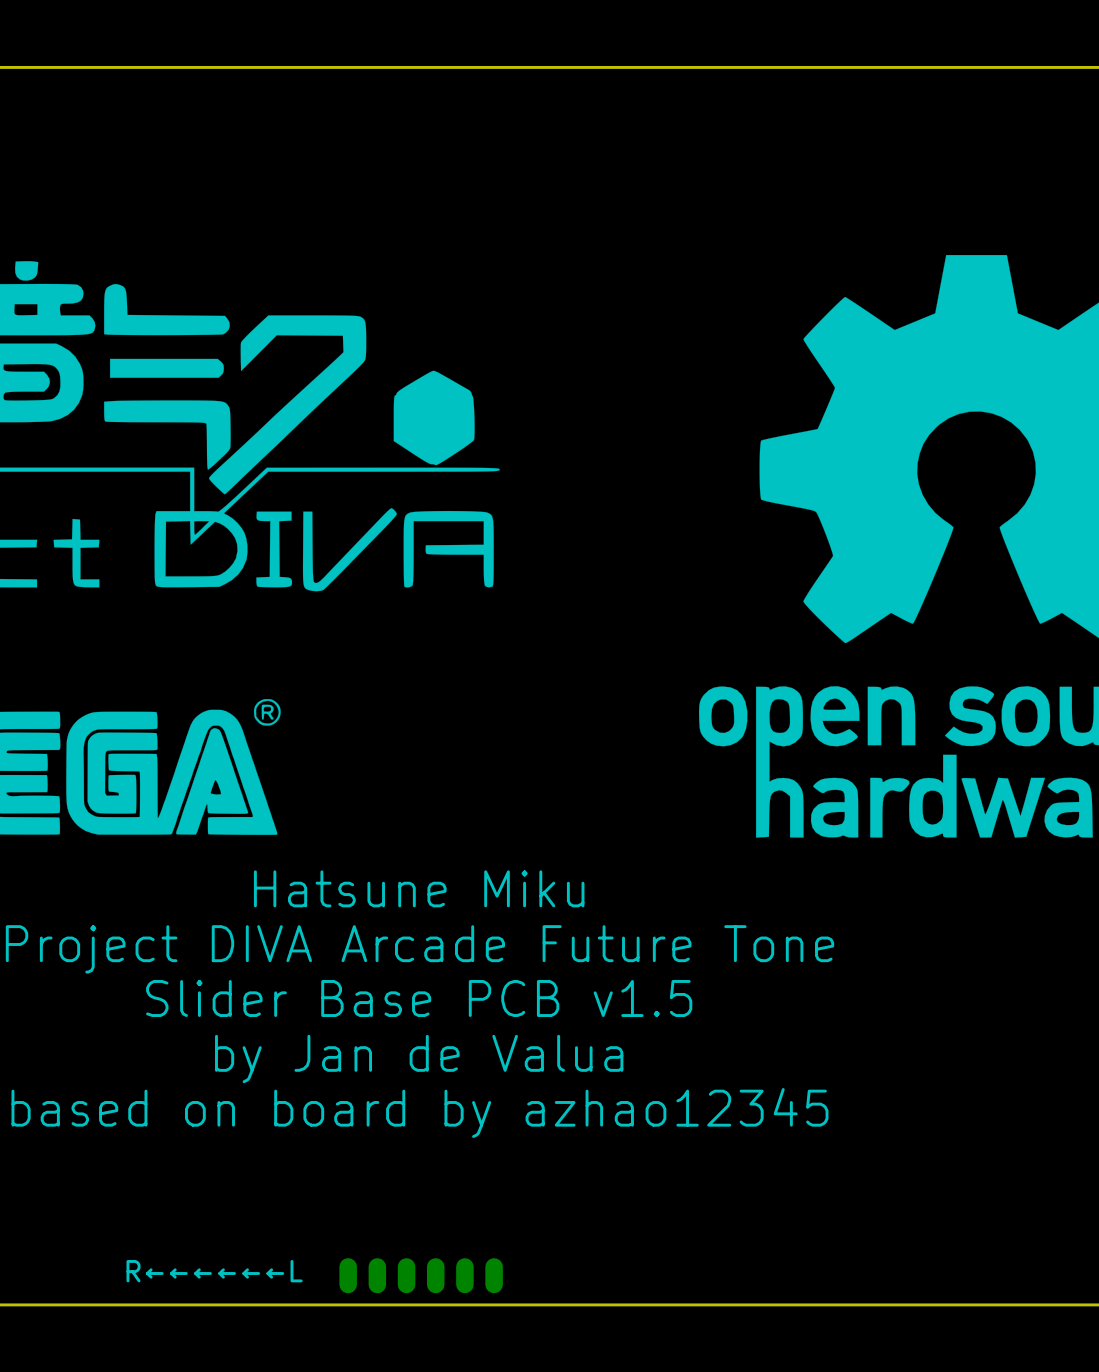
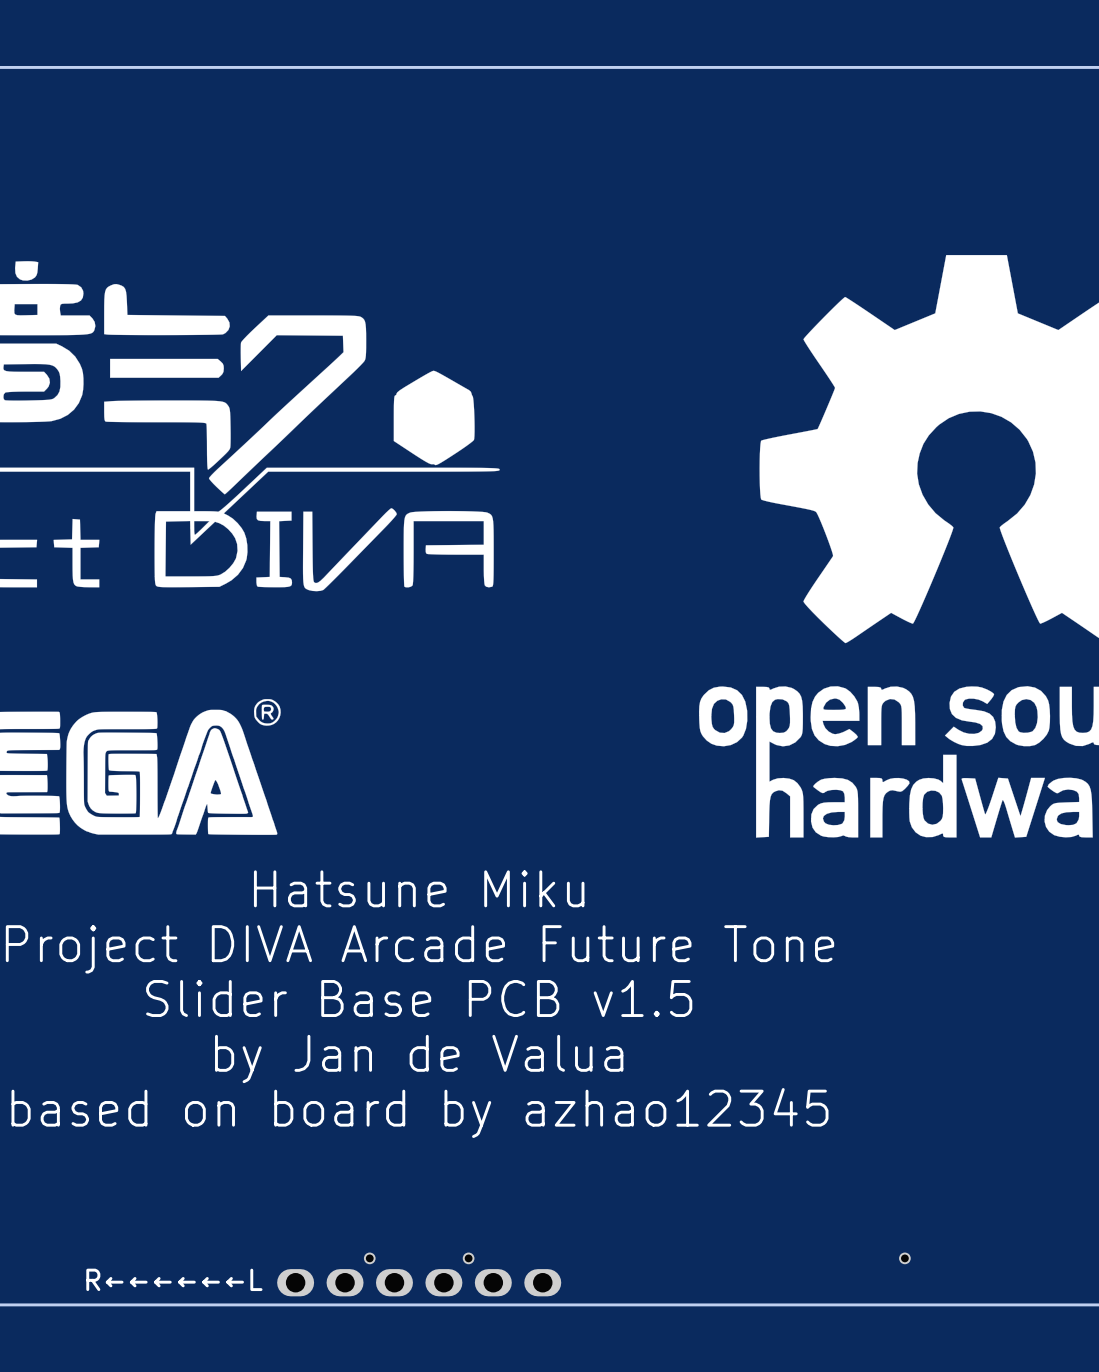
part footprint: [339, 1258, 503, 1294] -> [277, 1269, 562, 1297]
part: none -> (369, 1258)
part: none -> (468, 1258)
part: none -> (904, 1258)
text position: R←←←←←←L (214, 1271) -> R←←←←←←L (174, 1279)

